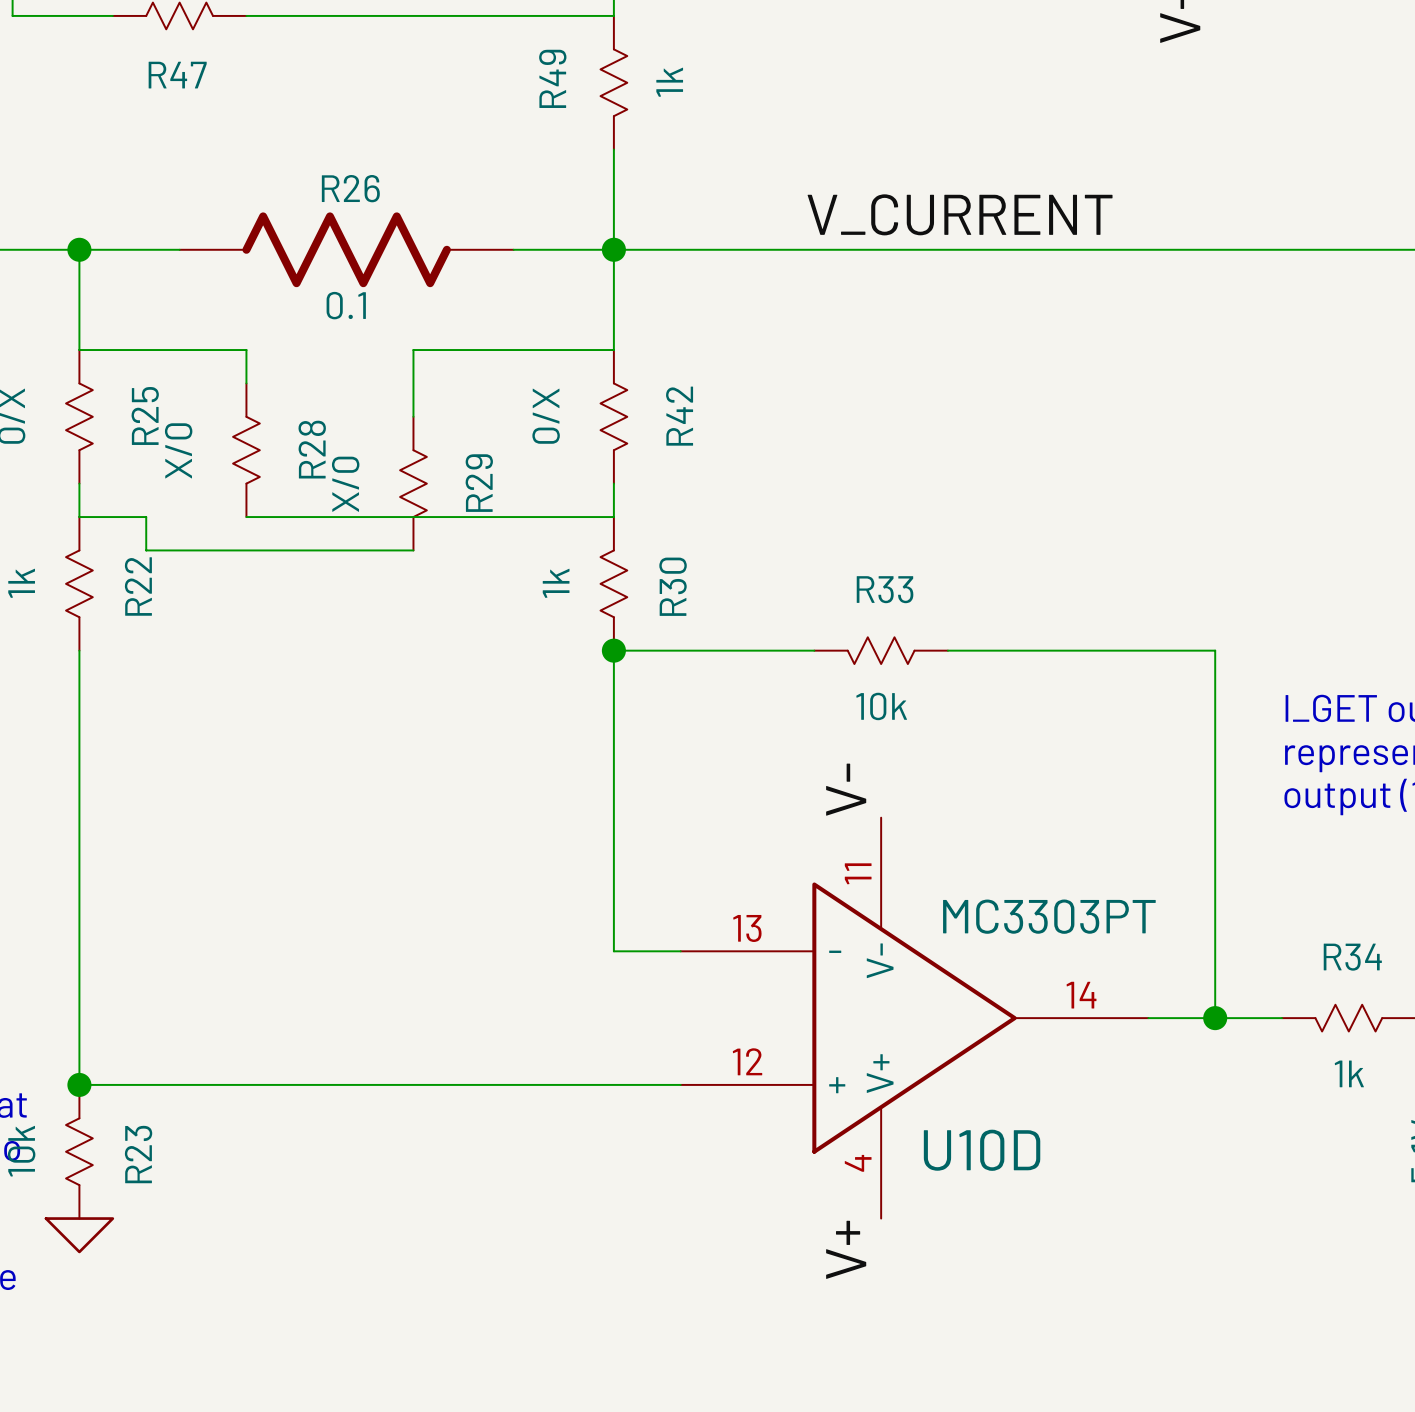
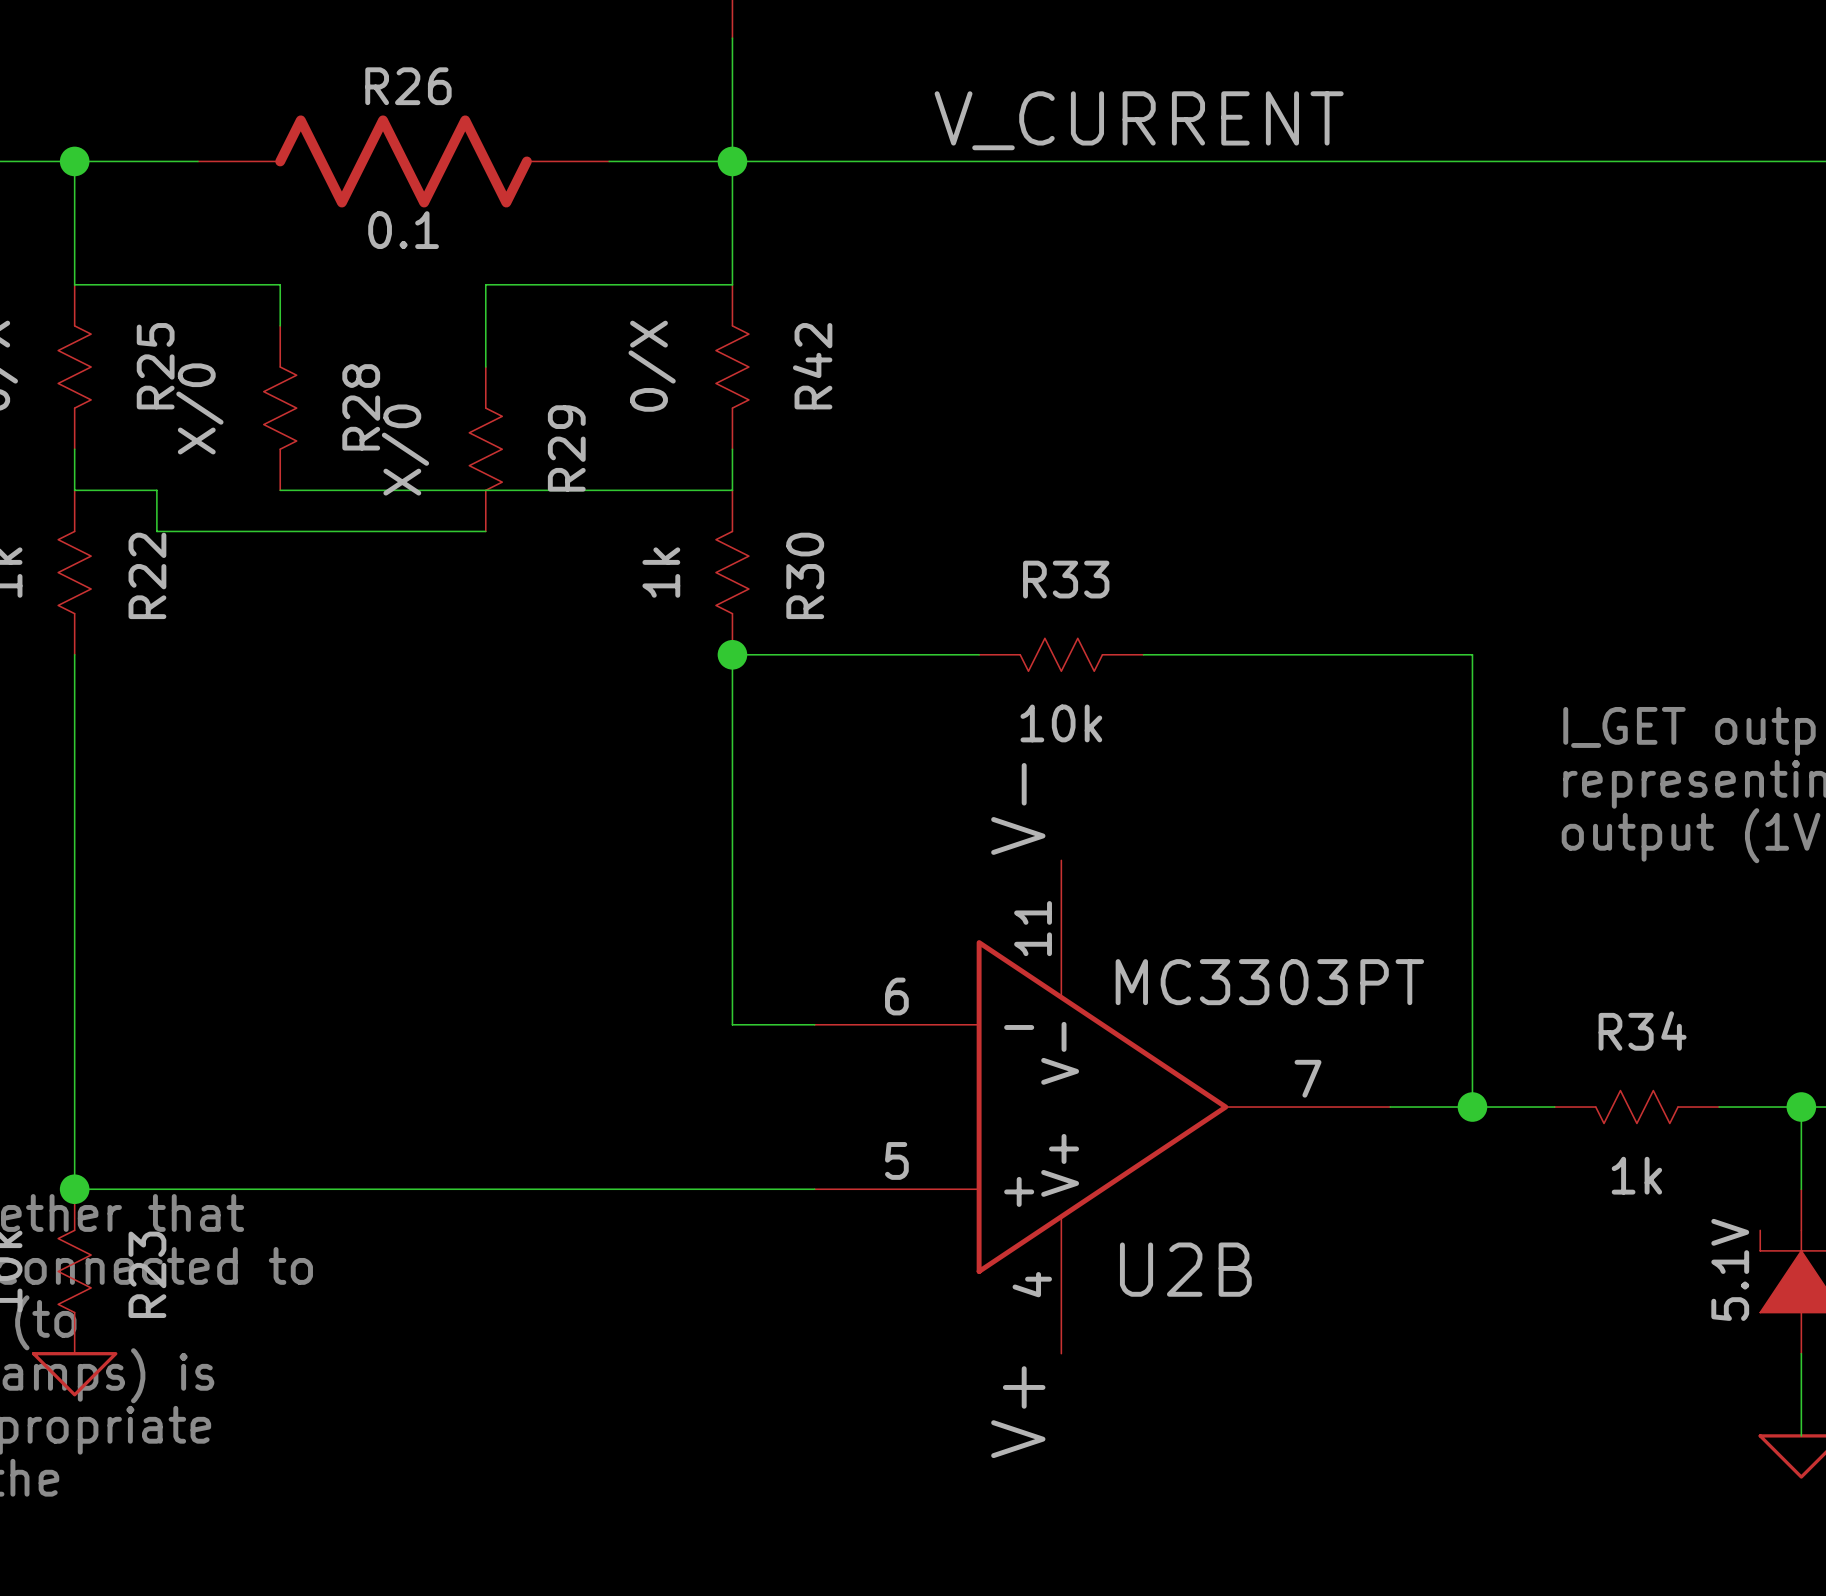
U10D pin number: 13 (747, 928) -> 6 (896, 996)
U10D pin number: 14 (1081, 995) -> 7 (1308, 1078)
U10D pin number: 12 (747, 1061) -> 5 (896, 1160)
U10D name: U10D (982, 1150) -> U2B (1185, 1269)

